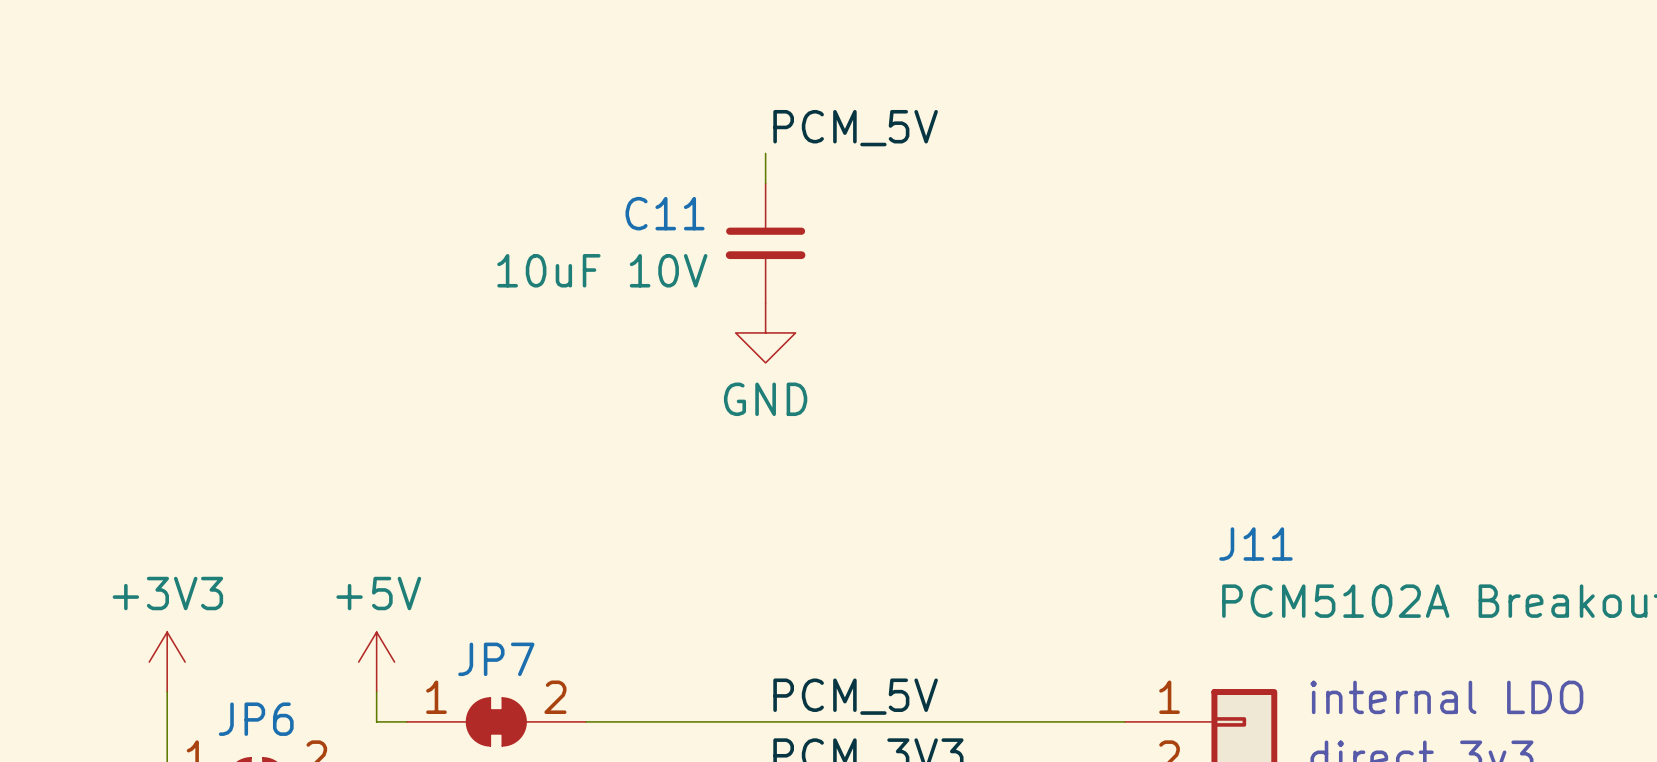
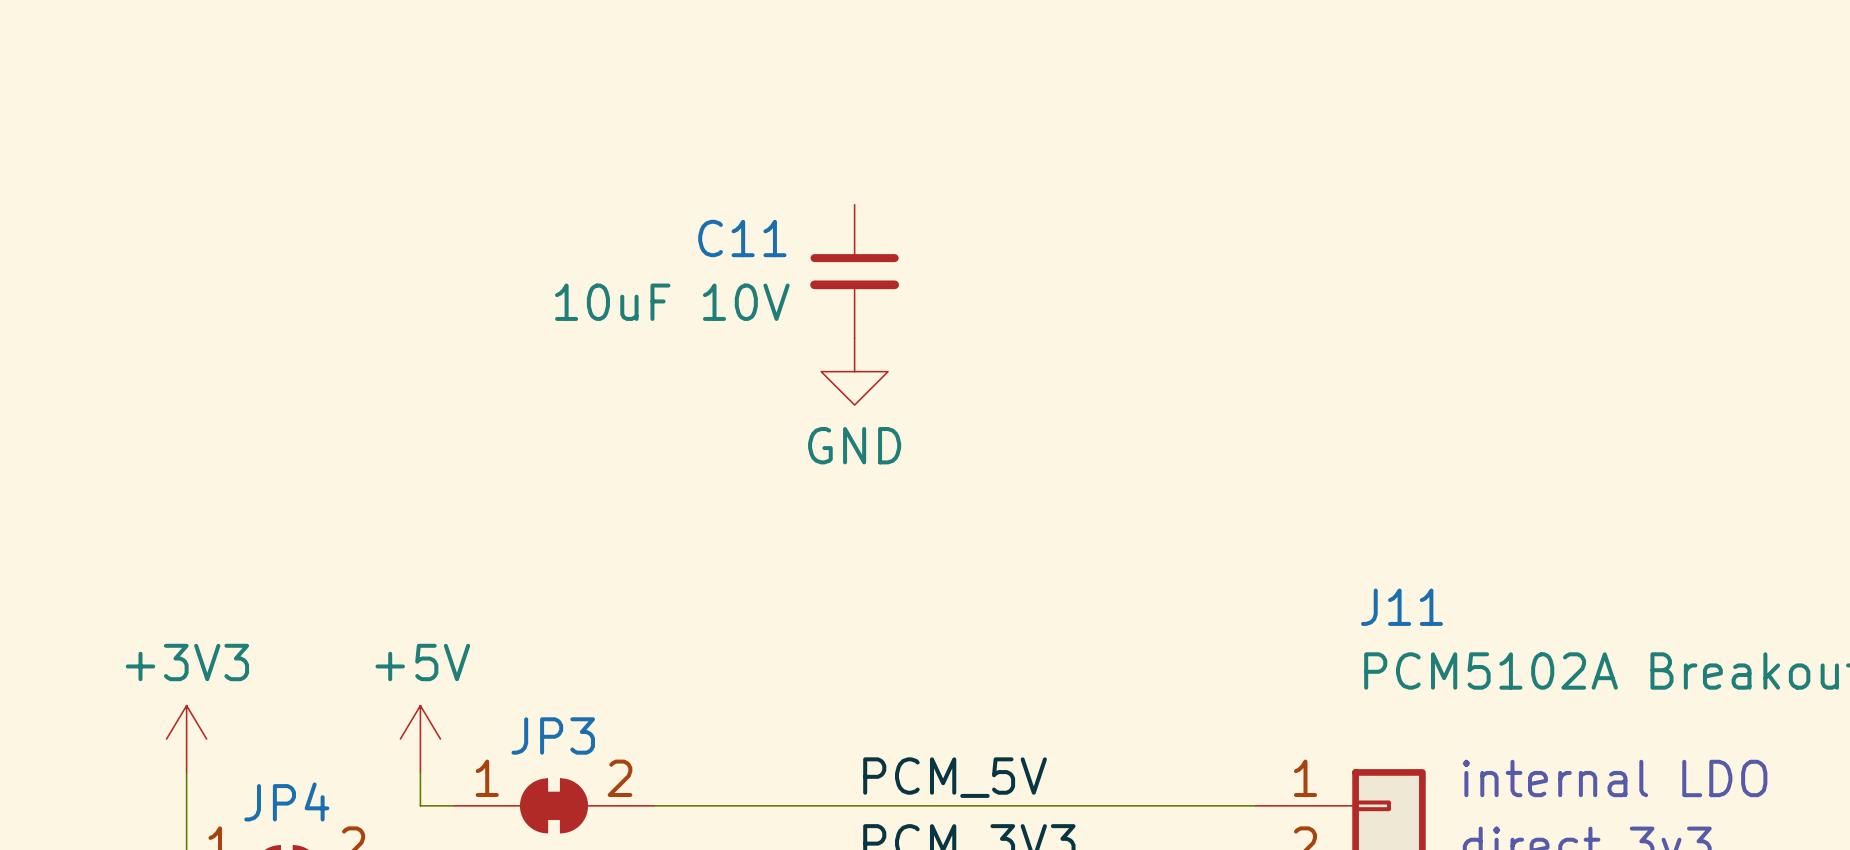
label: PCM_5V (855, 128) -> none
wire: (765, 153) (765, 183) -> none
JP7 name: JP7 (496, 659) -> JP3 (553, 735)
JP6 name: JP6 (256, 719) -> JP4 (286, 801)

